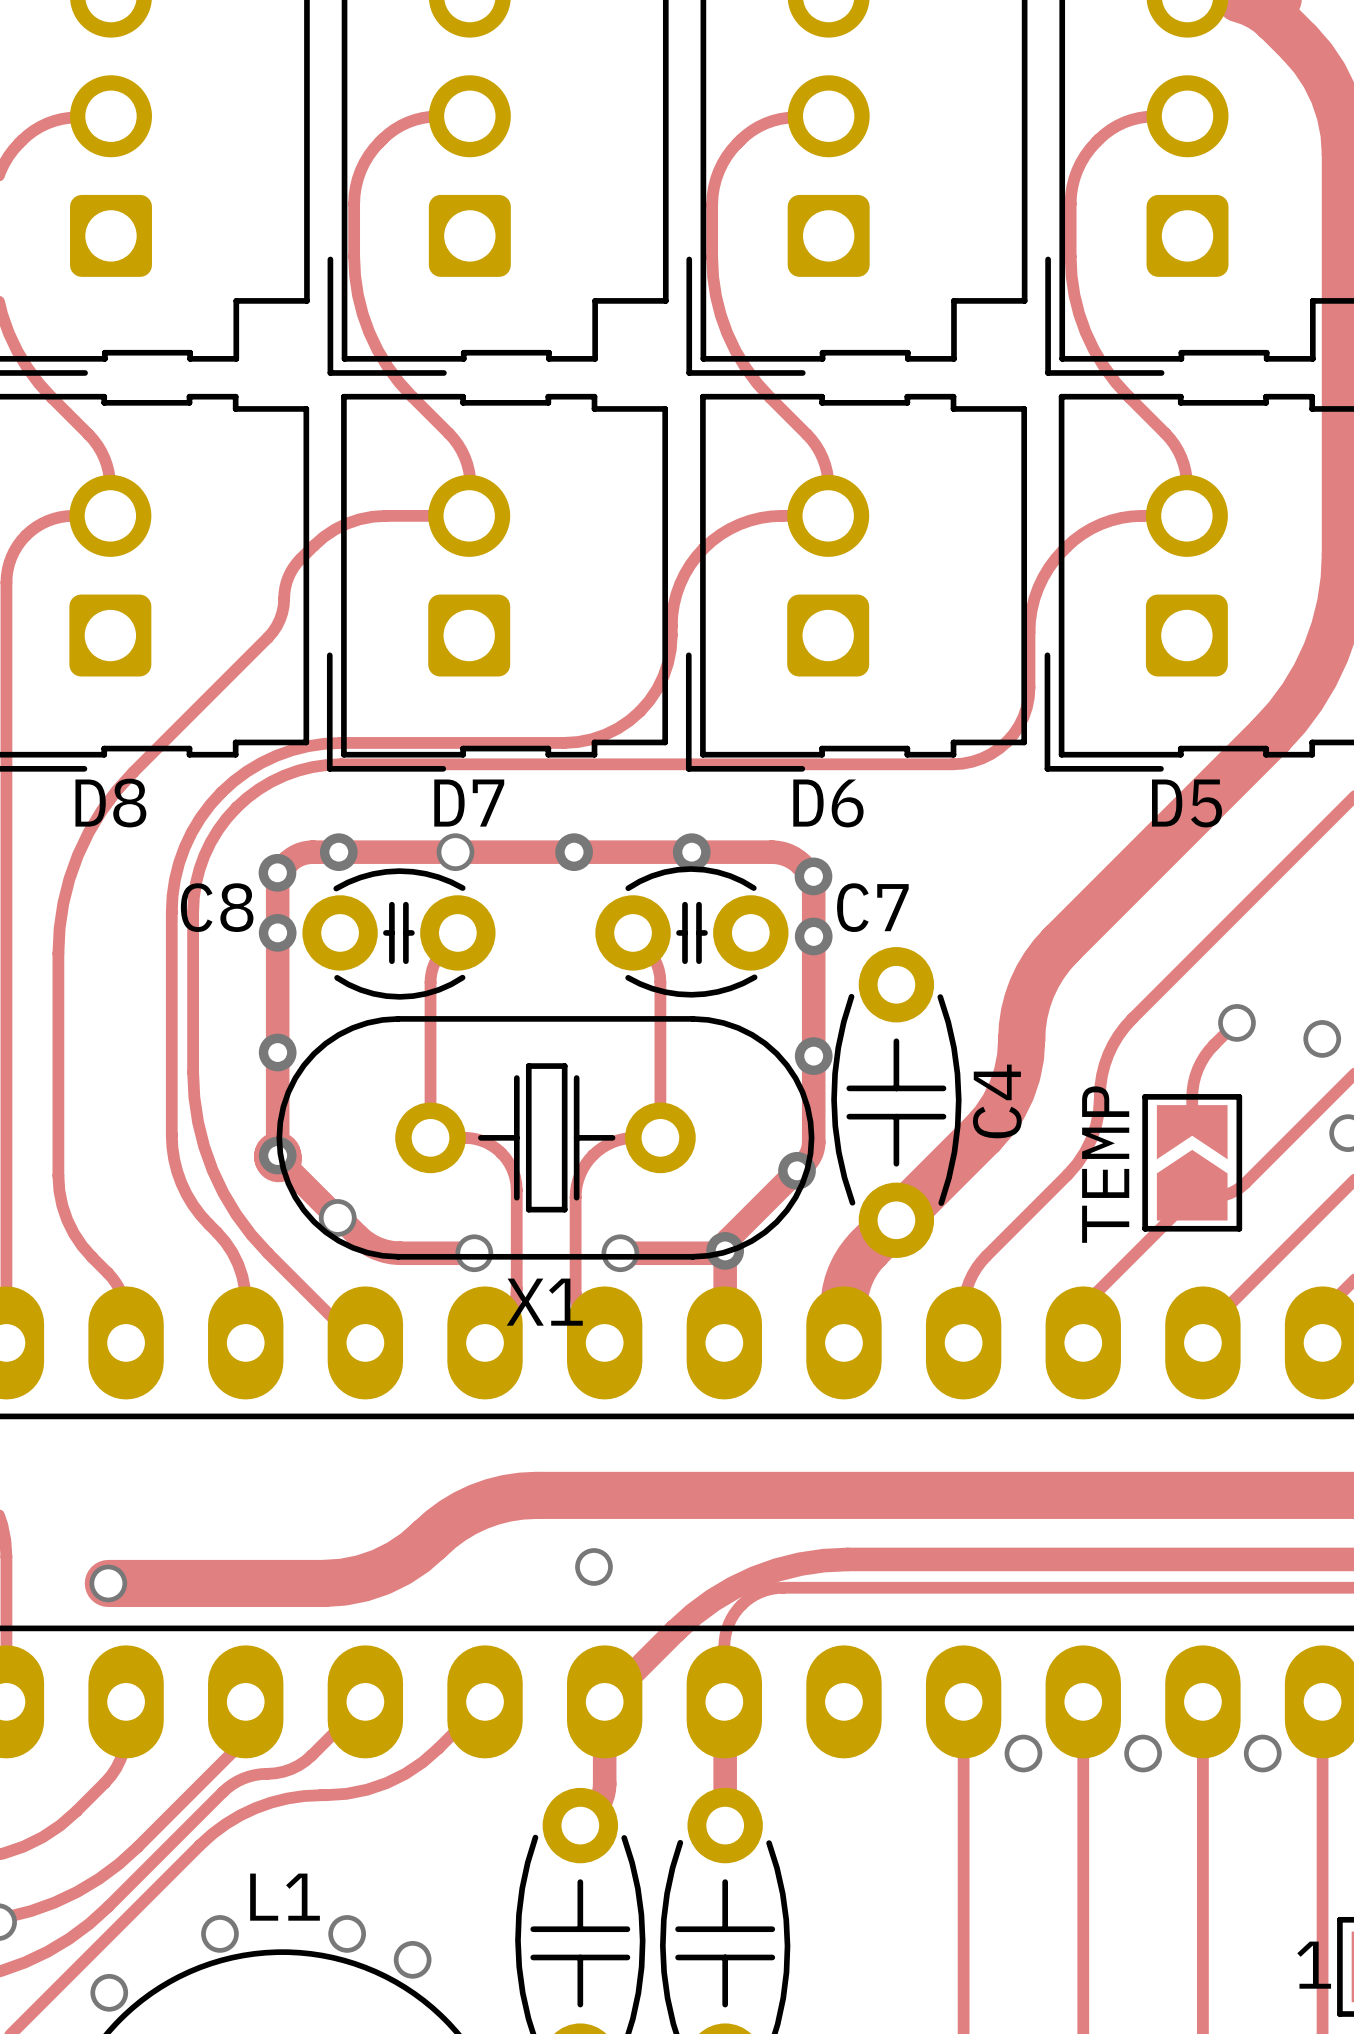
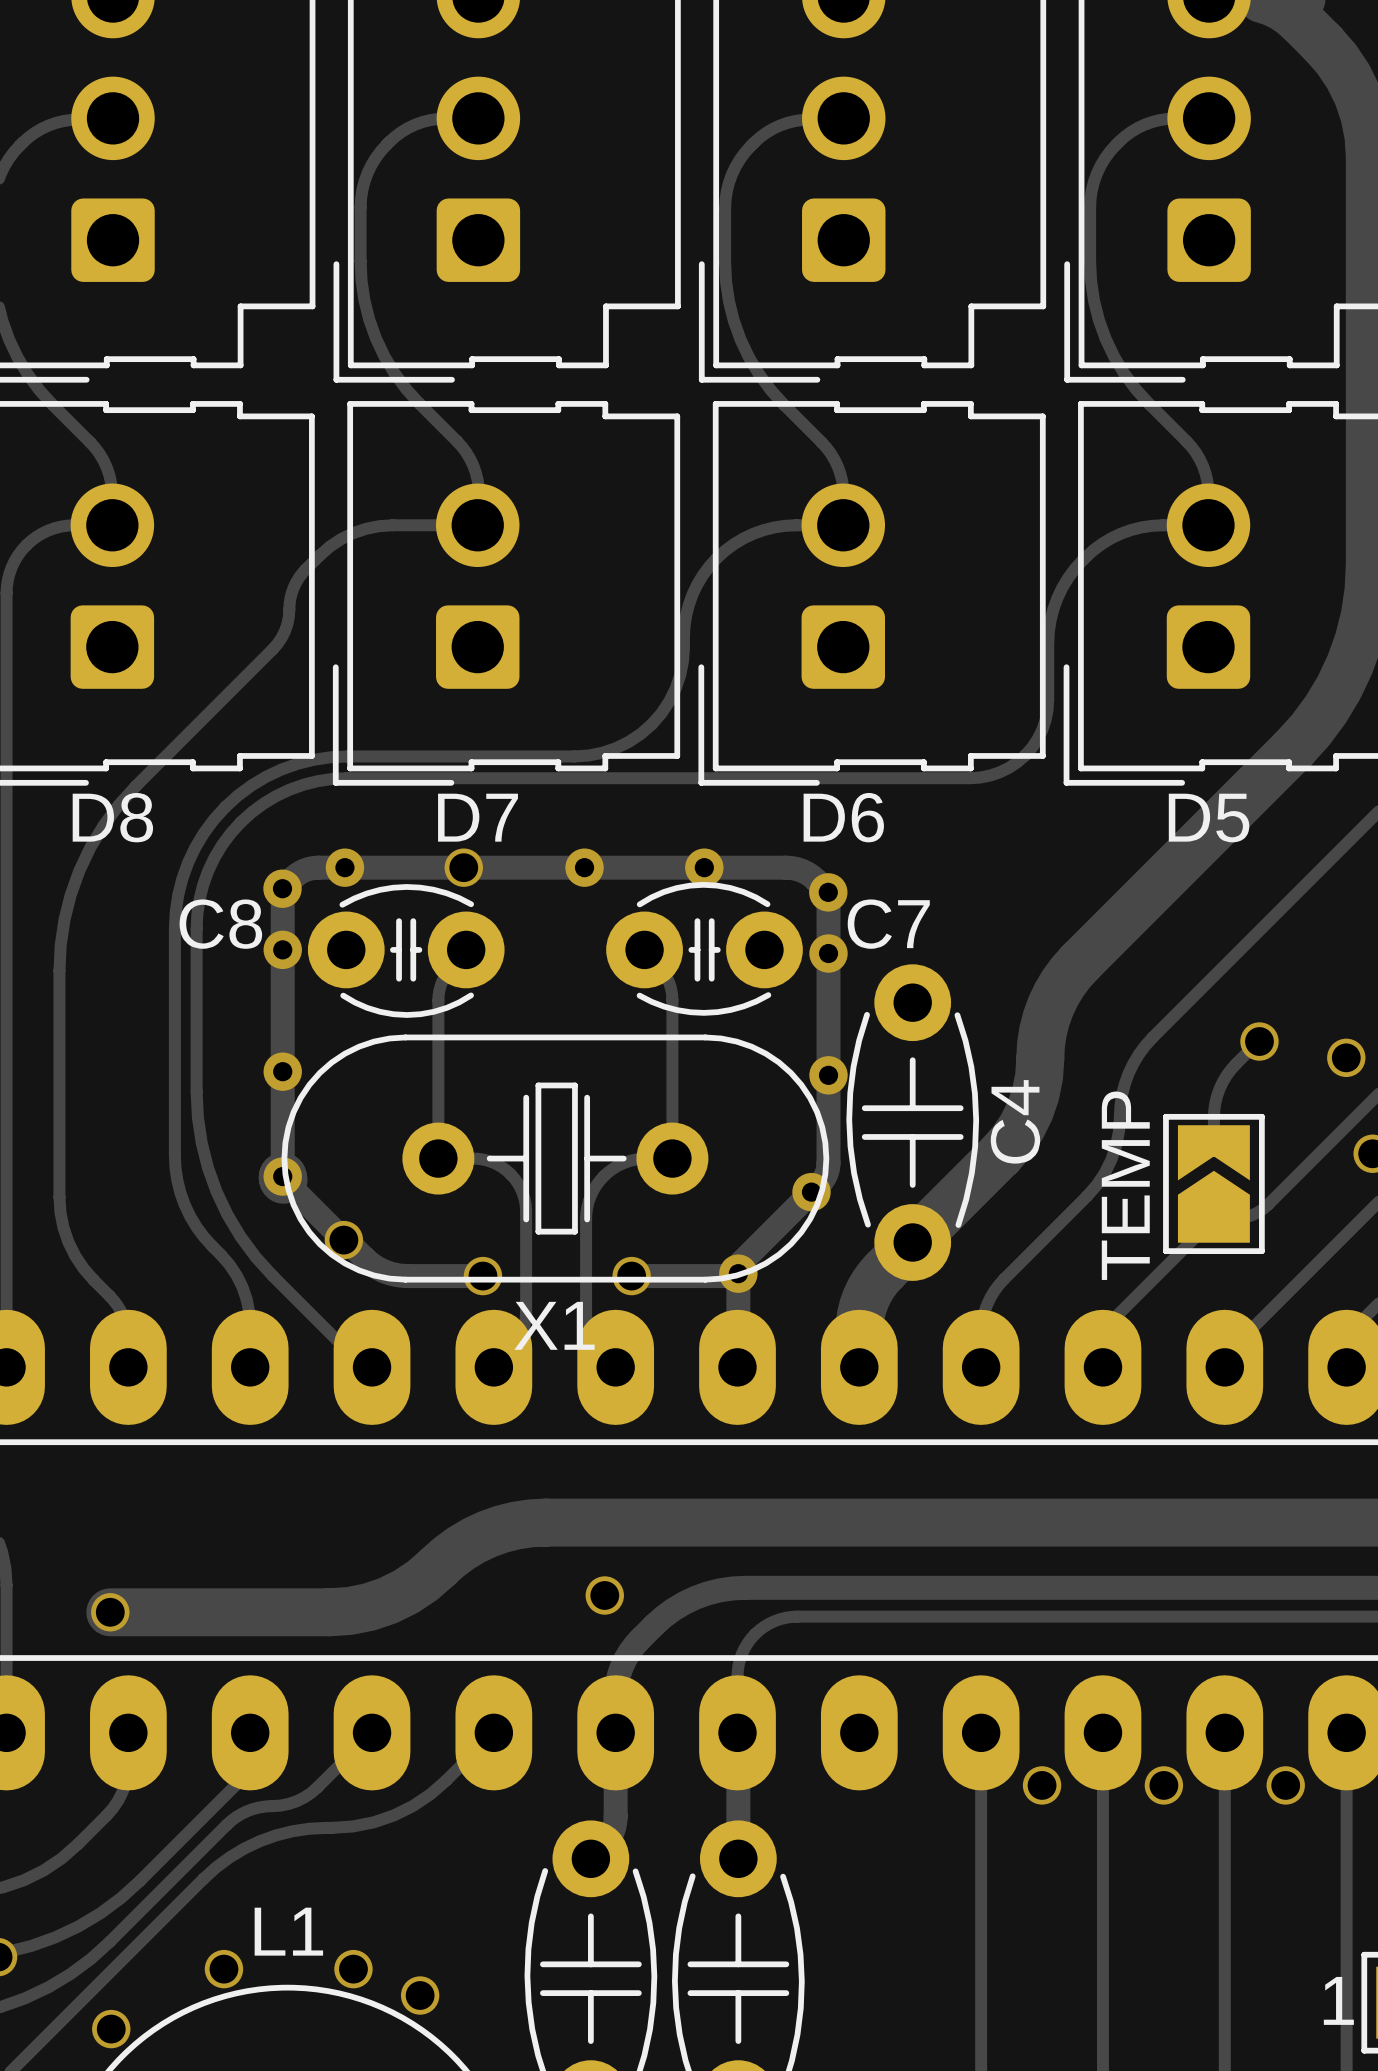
track: (847, 1559) (800, 1564) (777, 1569) (733, 1588) (693, 1614) (604, 1701) -> (863, 1587) (732, 1588) (707, 1593) (684, 1603) (653, 1625) (634, 1645) (625, 1658) (619, 1674) (616, 1690) (615, 1732)

